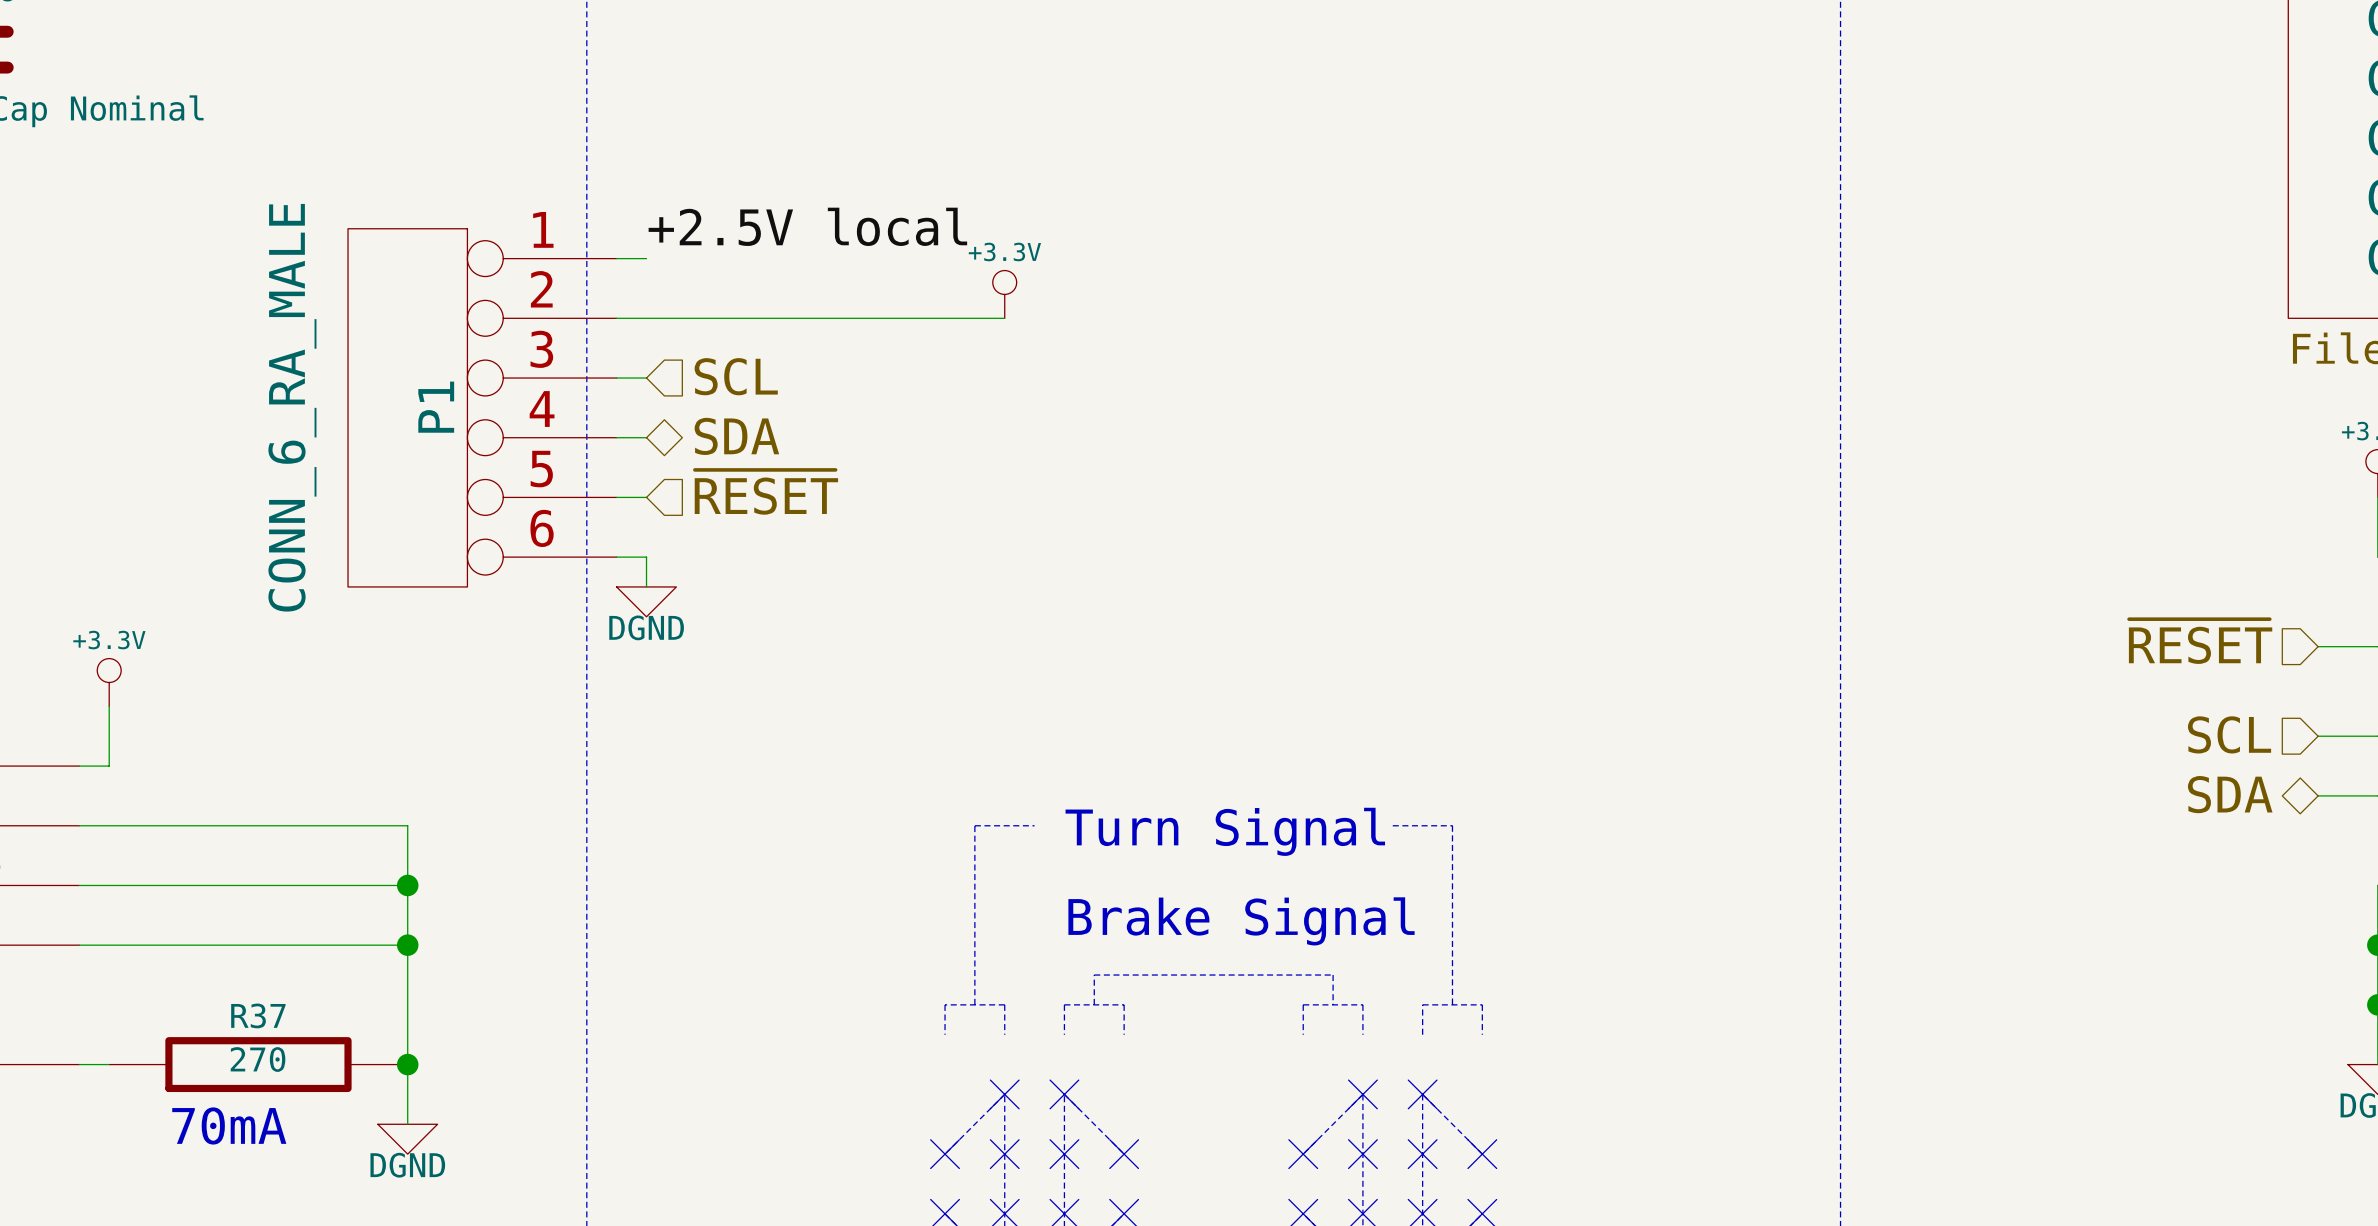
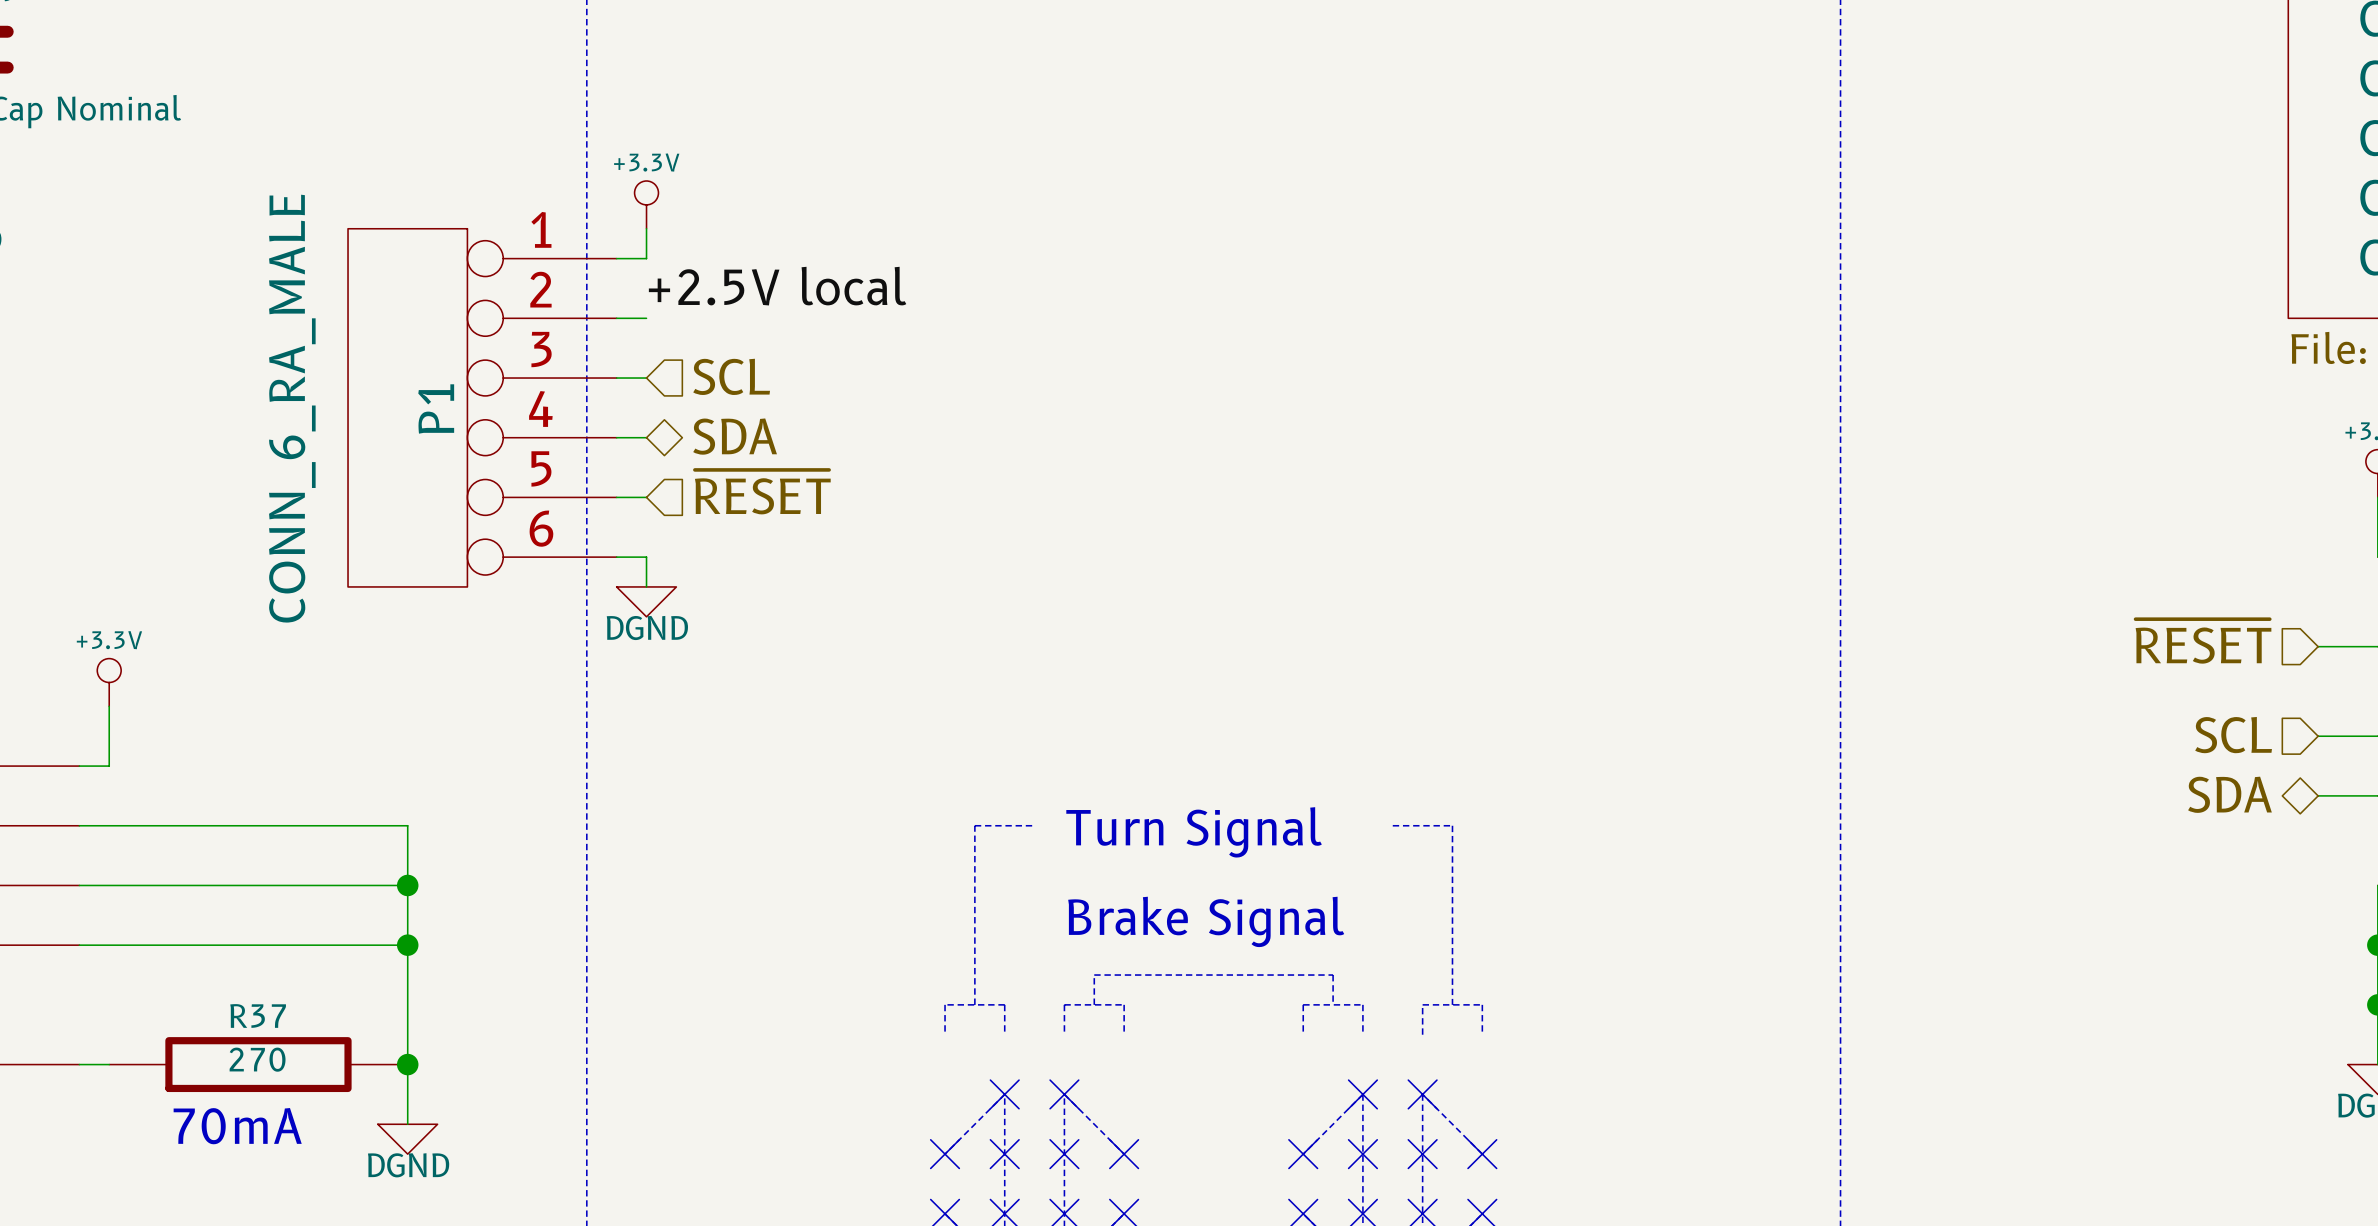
label position: +2.5V local (807, 226) -> +2.5V local (777, 286)
wire: none -> (646, 228) (646, 258)
power symbol position: +3.3V (1004, 294) -> +3.3V (646, 204)
wire: (646, 318) (1004, 318) -> none

